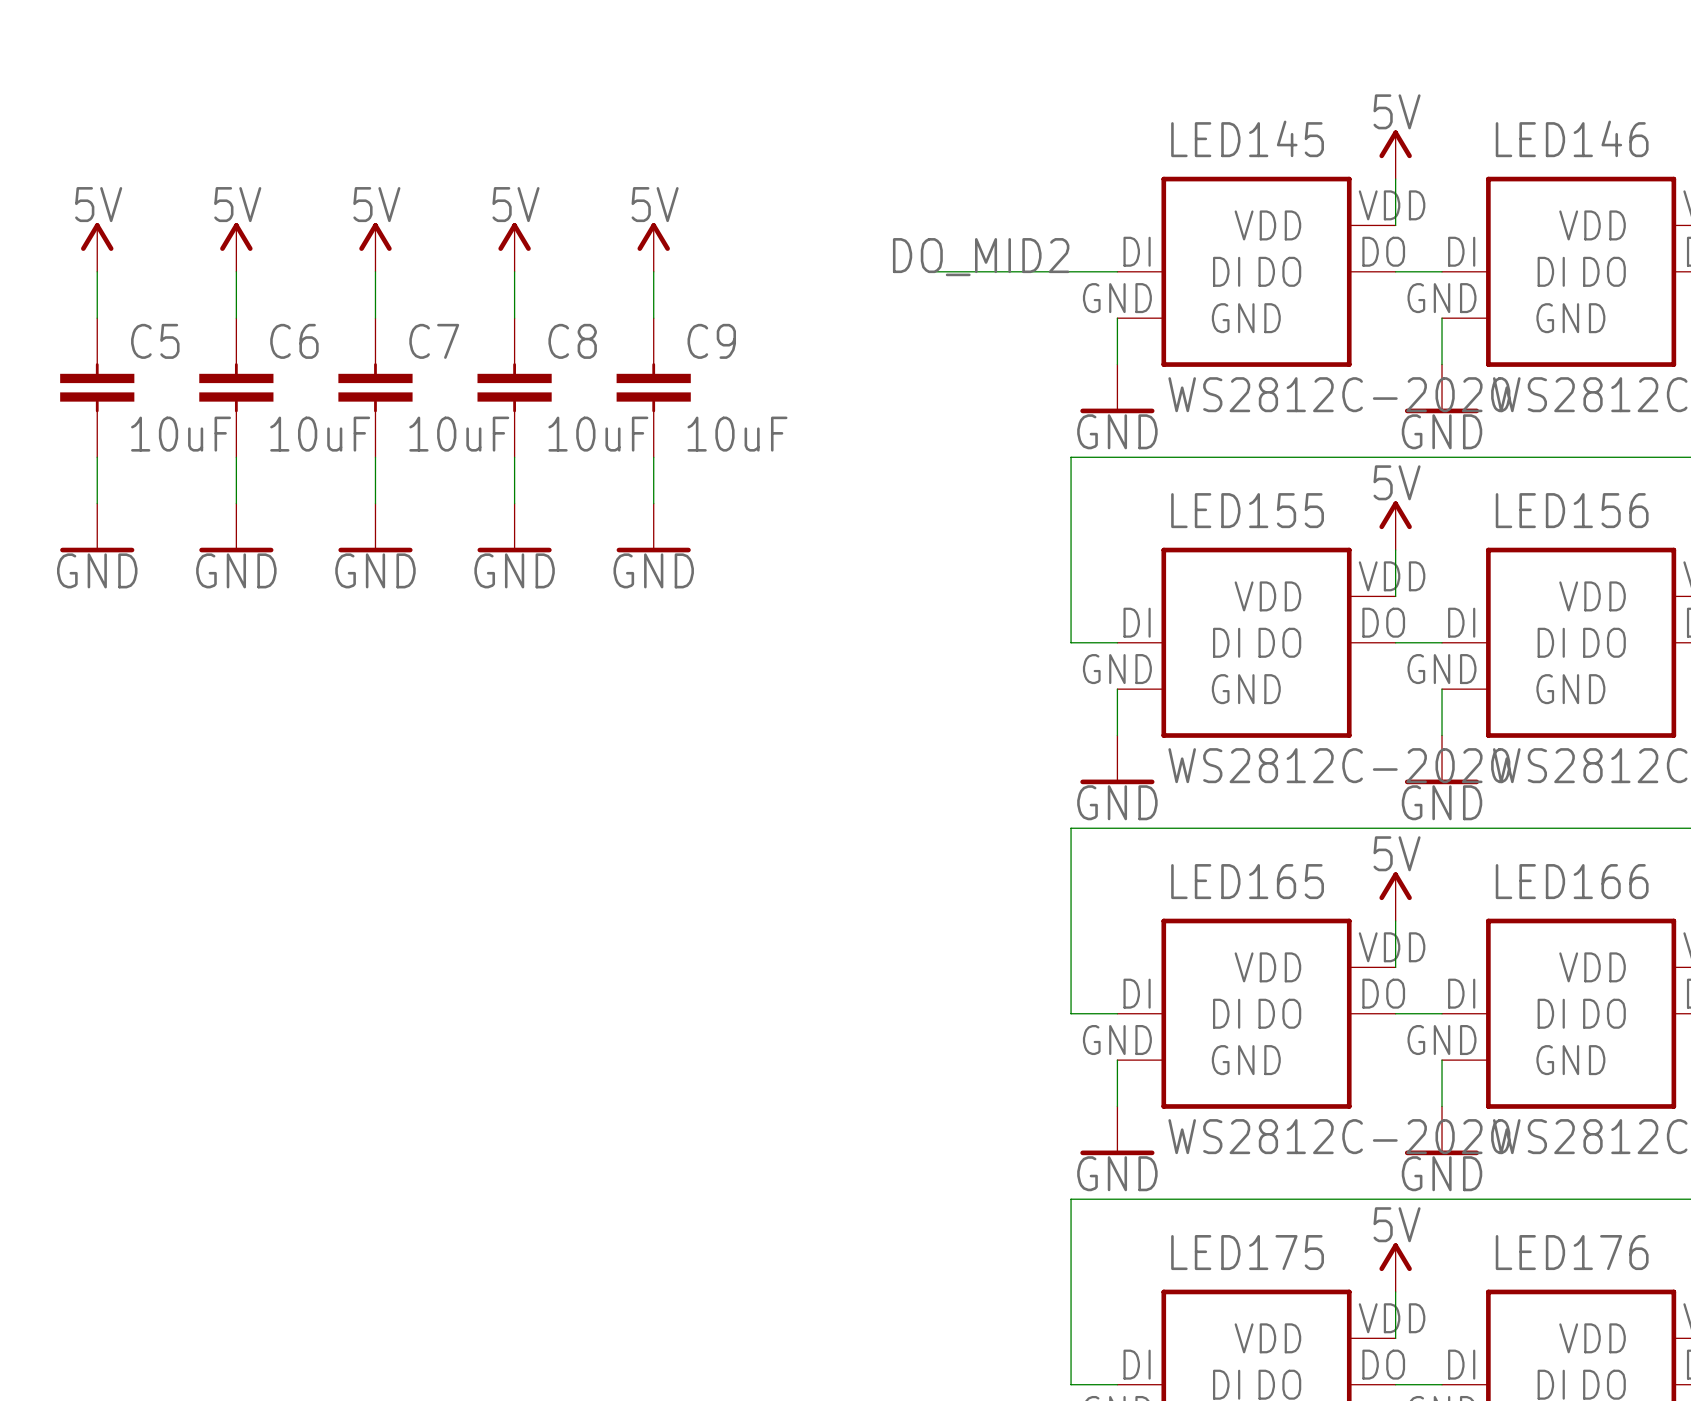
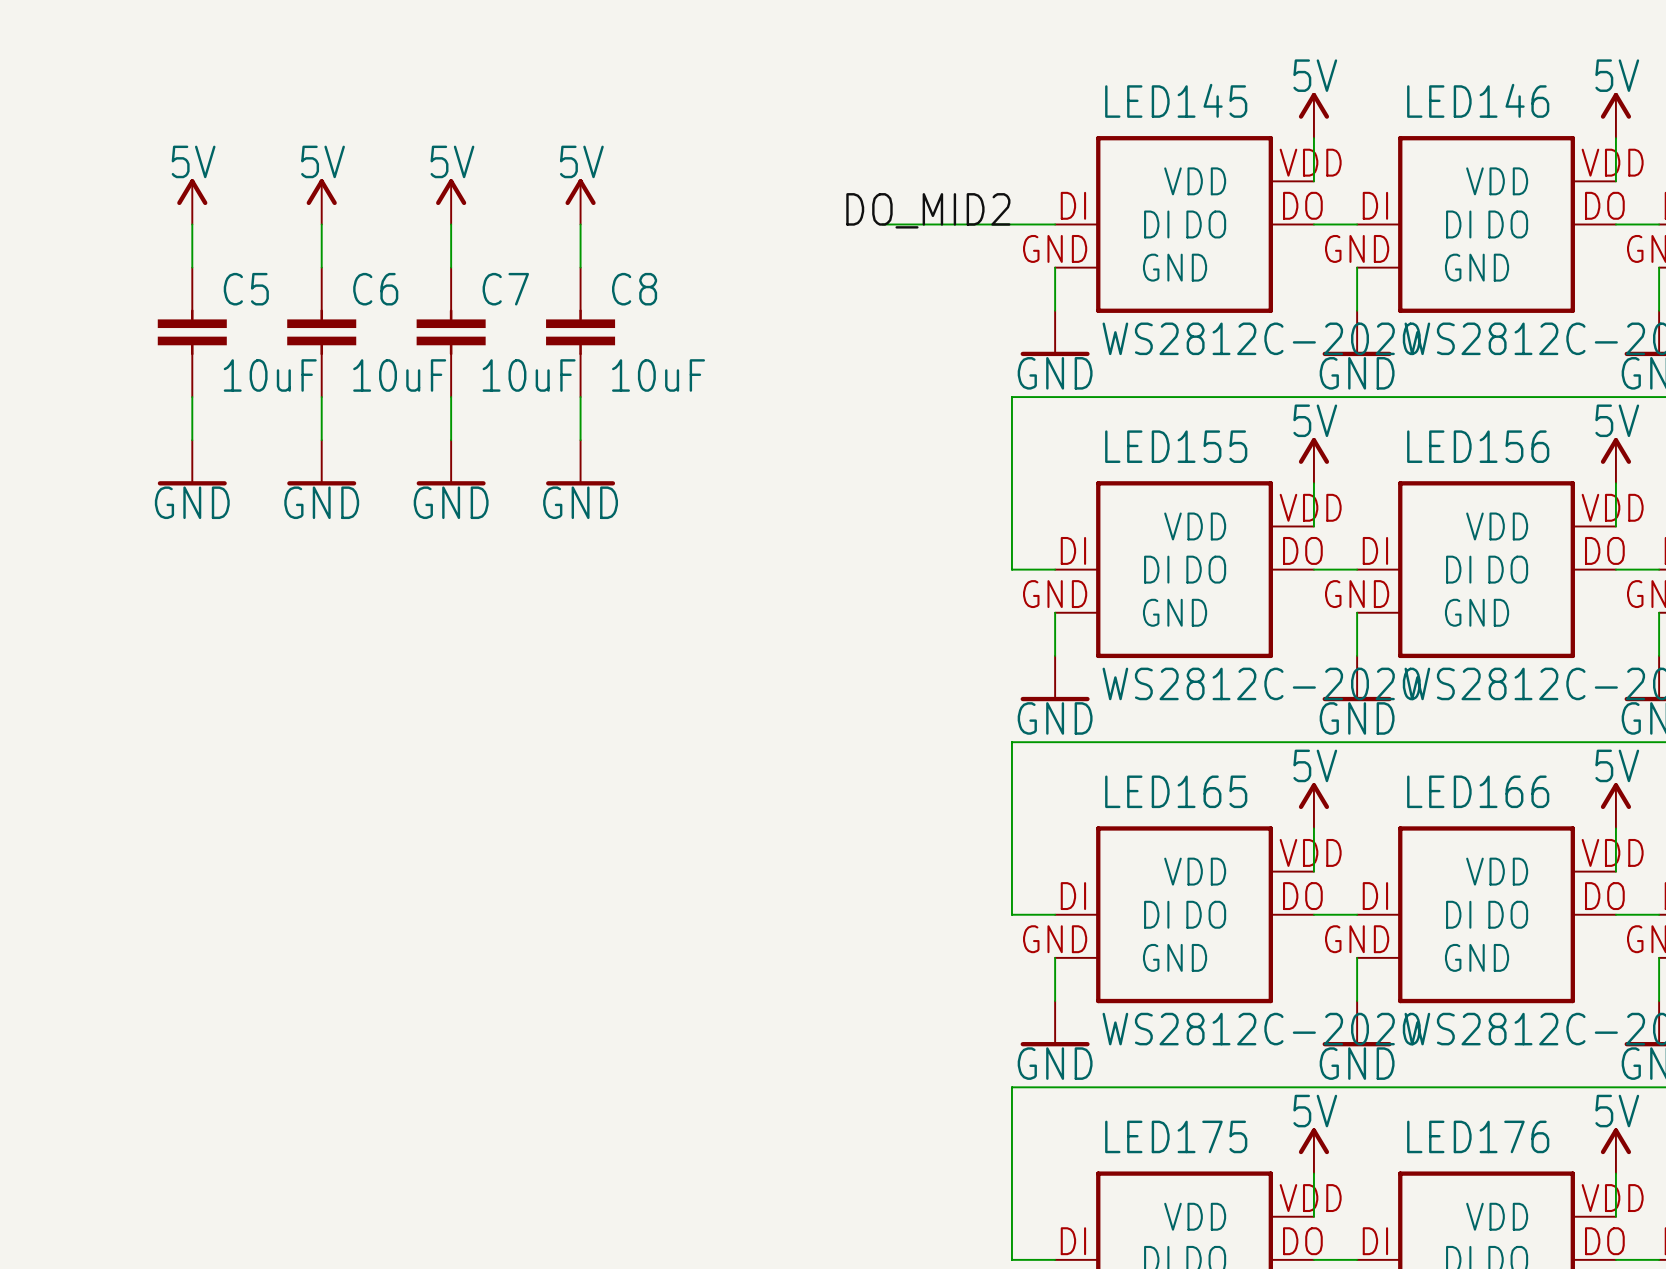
power symbol: 5V (97, 247) -> none
power symbol: none -> 5V (192, 201)
power symbol: 5V (236, 247) -> none
power symbol: none -> 5V (321, 201)
power symbol: 5V (375, 247) -> none
power symbol: none -> 5V (451, 201)
power symbol: 5V (514, 247) -> none
power symbol: none -> 5V (580, 201)
power symbol: 5V (653, 247) -> none
wire: (97, 271) (97, 318) -> none
wire: (236, 271) (236, 318) -> (192, 224) (192, 267)
wire: (375, 271) (375, 318) -> (321, 224) (321, 267)
wire: (514, 271) (514, 318) -> (451, 224) (451, 267)
wire: (653, 271) (653, 318) -> (580, 224) (580, 267)
C5 position: (97, 387) -> (192, 332)
C6 position: (236, 387) -> (321, 332)
C7 position: (375, 387) -> (451, 332)
C8 position: (514, 387) -> (580, 332)
C9: 10uF (653, 387) -> none
wire: (97, 457) (97, 503) -> none
wire: (236, 457) (236, 503) -> (192, 397) (192, 440)
wire: (375, 457) (375, 503) -> (321, 397) (321, 440)
wire: (514, 457) (514, 503) -> (451, 397) (451, 440)
wire: (653, 457) (653, 503) -> (580, 397) (580, 440)
power symbol: GND (97, 528) -> none
power symbol: none -> GND (192, 462)
power symbol: GND (236, 528) -> none
power symbol: none -> GND (321, 462)
power symbol: GND (375, 528) -> none
power symbol: none -> GND (451, 462)
power symbol: GND (514, 528) -> none
power symbol: none -> GND (580, 462)
power symbol: GND (653, 528) -> none

